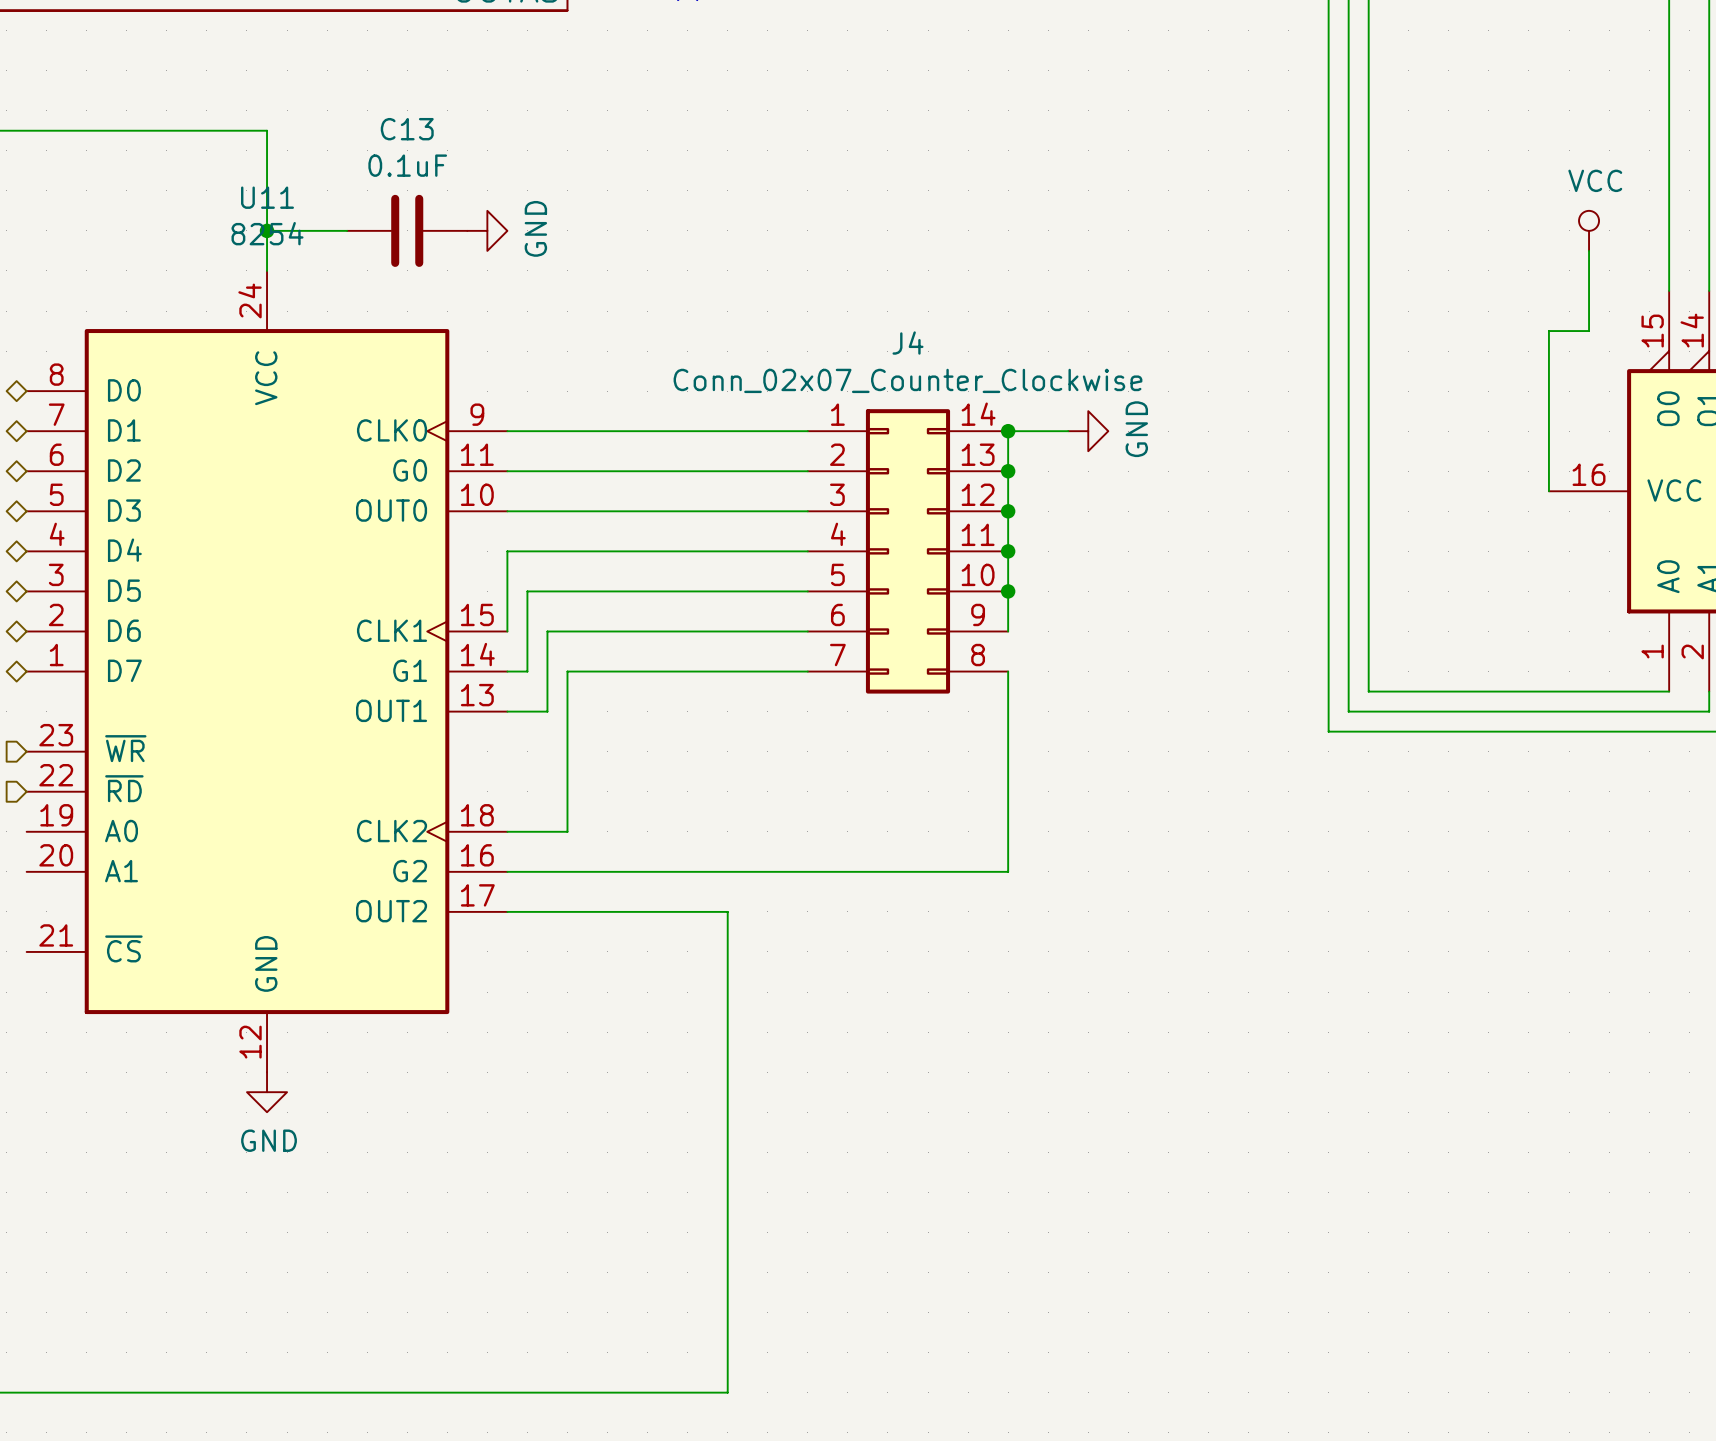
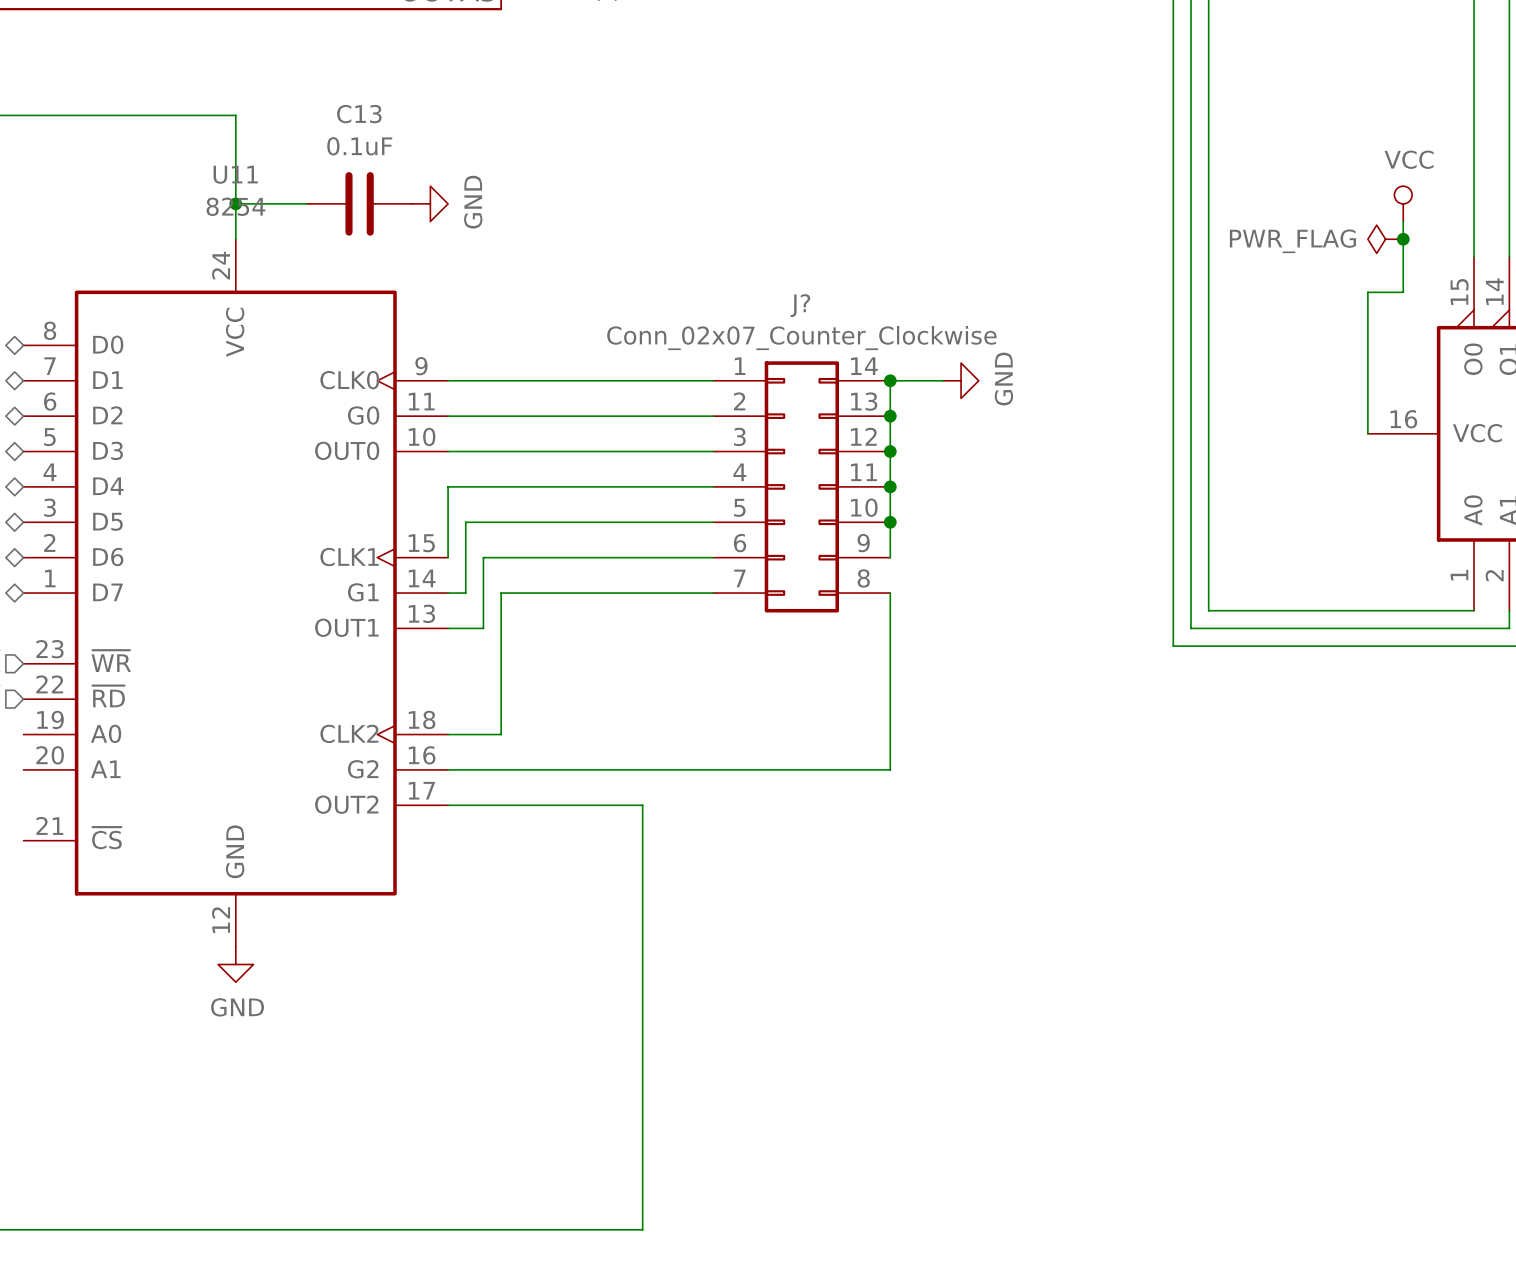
power symbol: none -> PWR_FLAG (1385, 239)
junction: none -> (1403, 239)
J4 name: J4 (907, 343) -> J? (800, 305)

